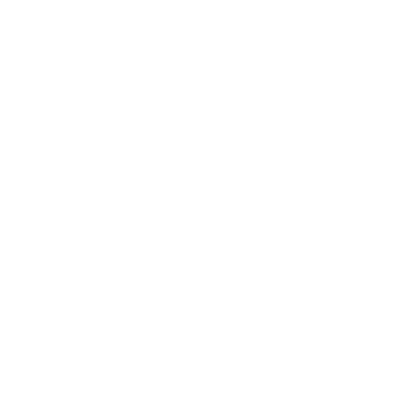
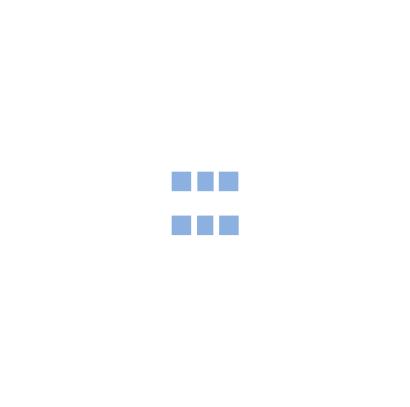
part: none -> (205, 203)

